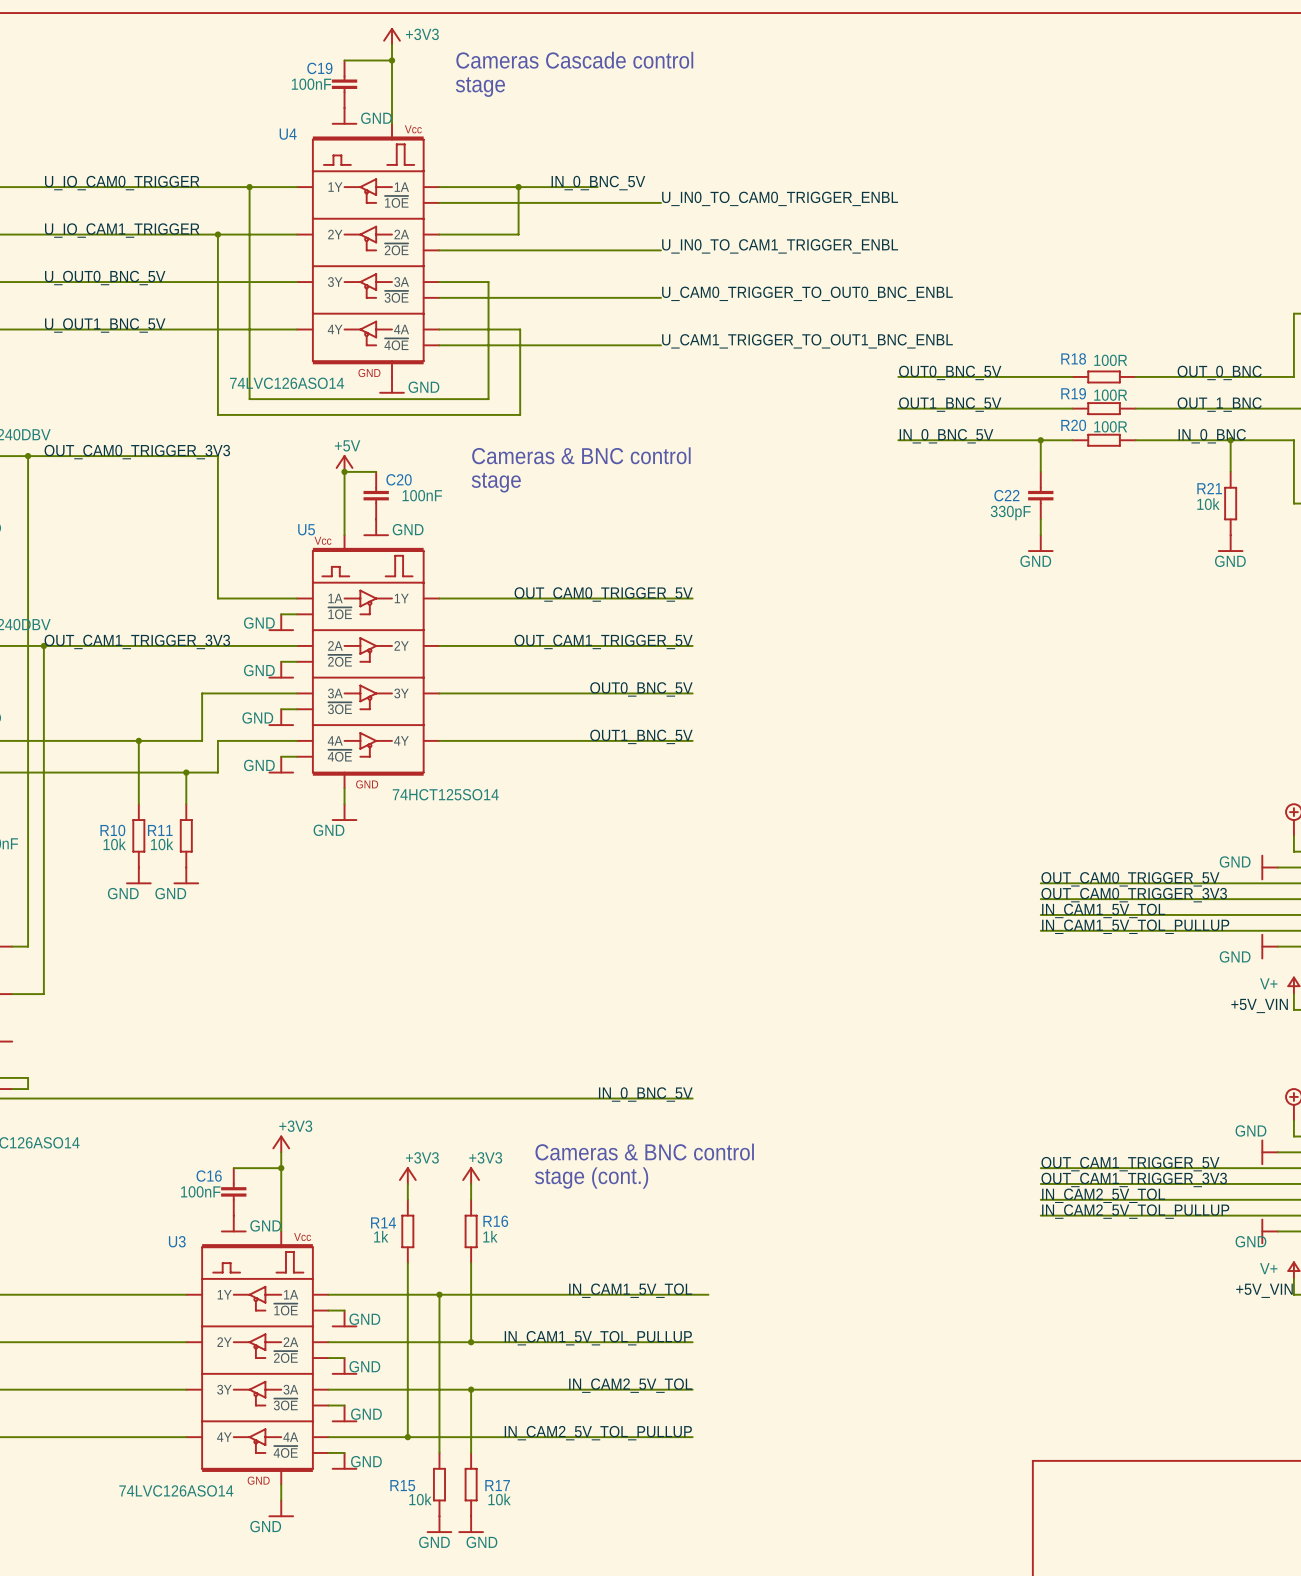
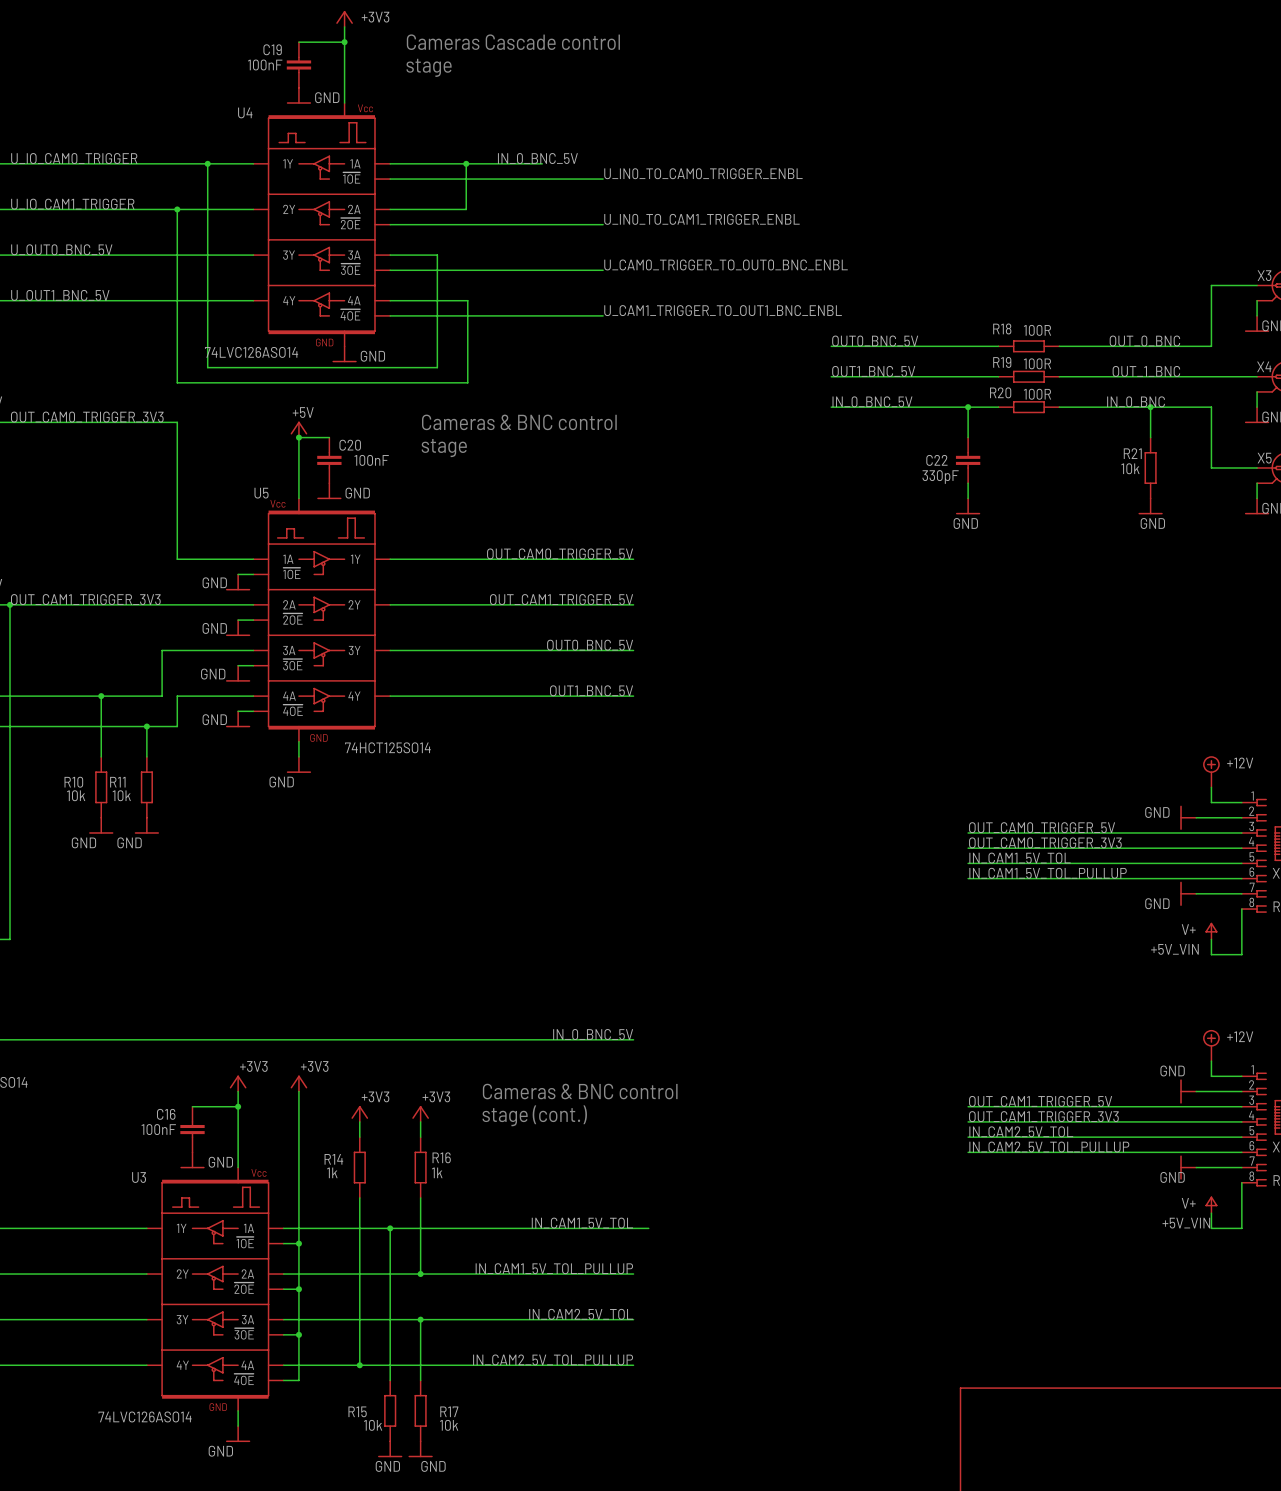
power symbol: none -> +3V3 (298, 1083)
wire: none -> (298, 1091) (298, 1380)
junction: none -> (298, 1243)
power symbol: GND (344, 1318) -> none
junction: none -> (298, 1289)
power symbol: GND (344, 1366) -> none
junction: none -> (298, 1334)
power symbol: GND (344, 1413) -> none
power symbol: GND (344, 1461) -> none

